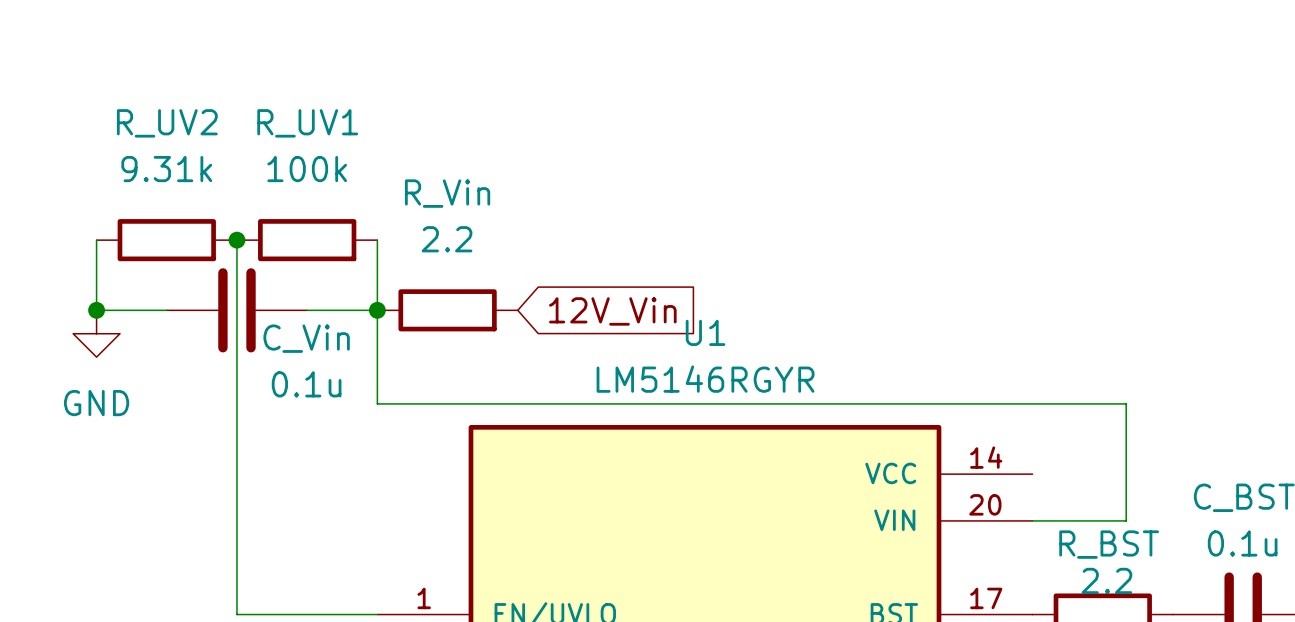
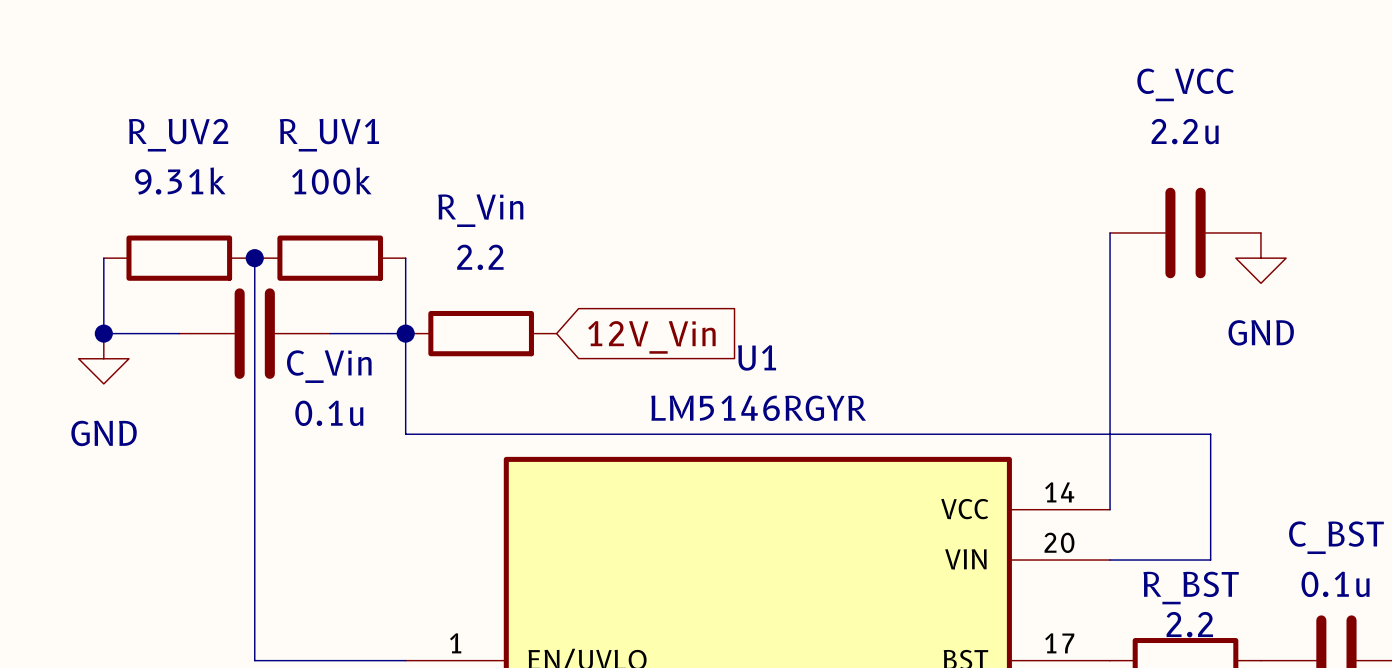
wire: none -> (1110, 232) (1110, 509)
C_VCC: none -> 2.2u (1185, 232)
power symbol: none -> GND (1260, 258)

